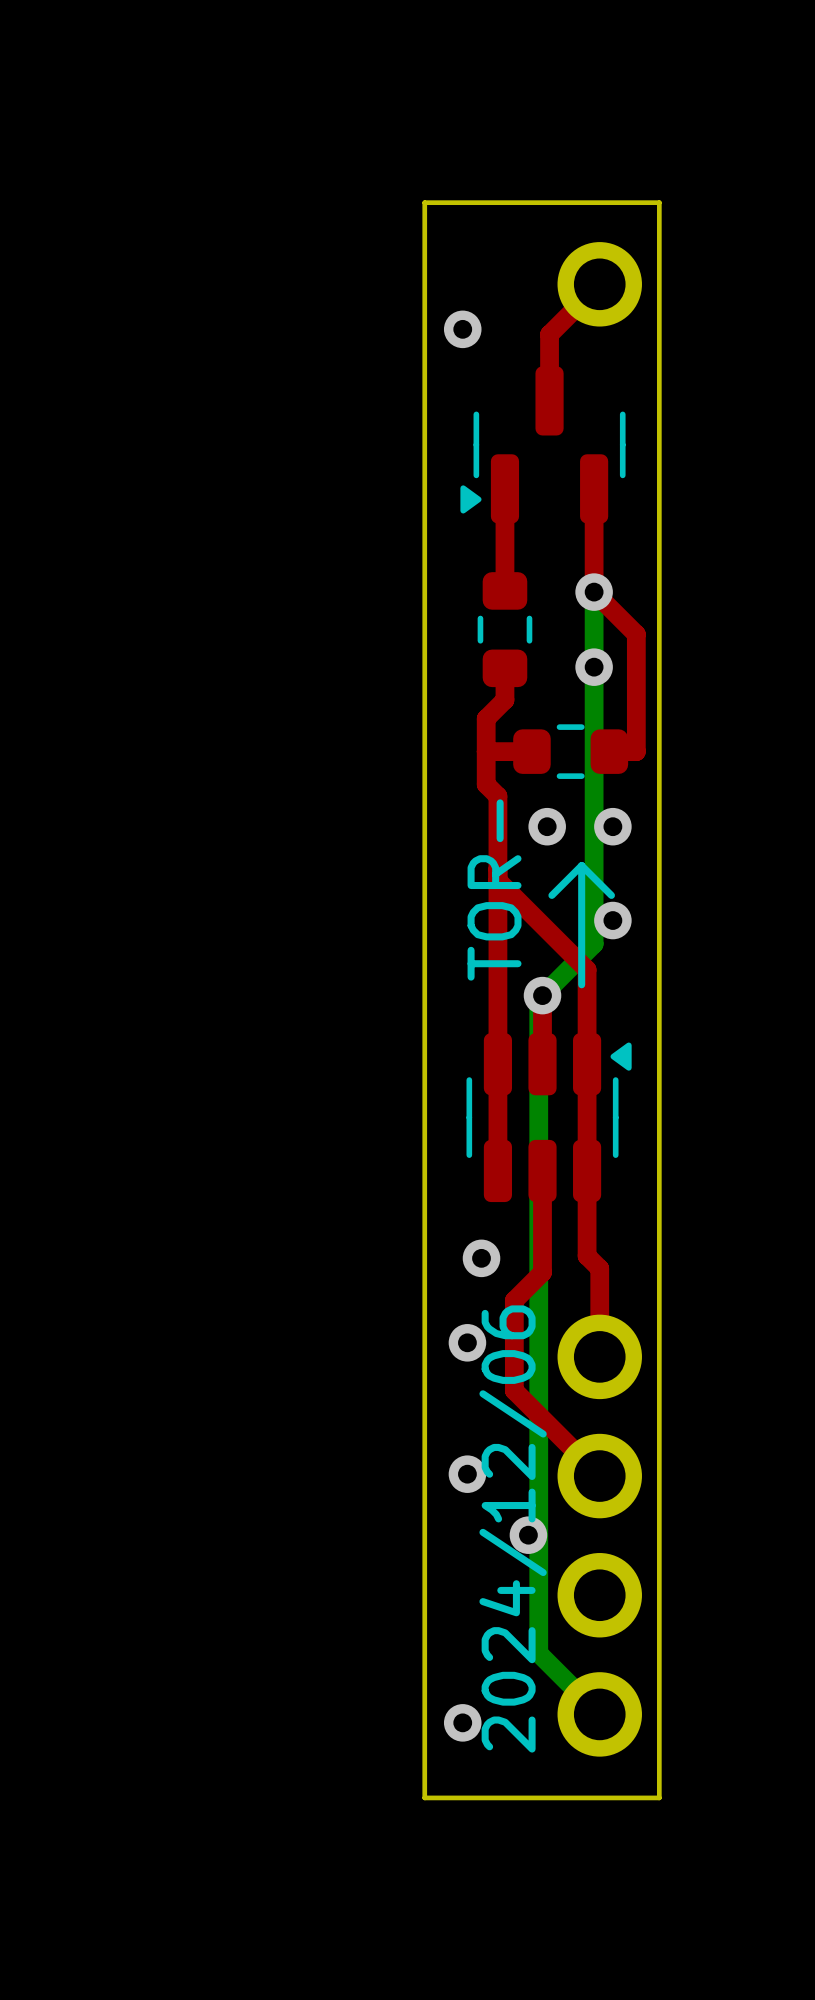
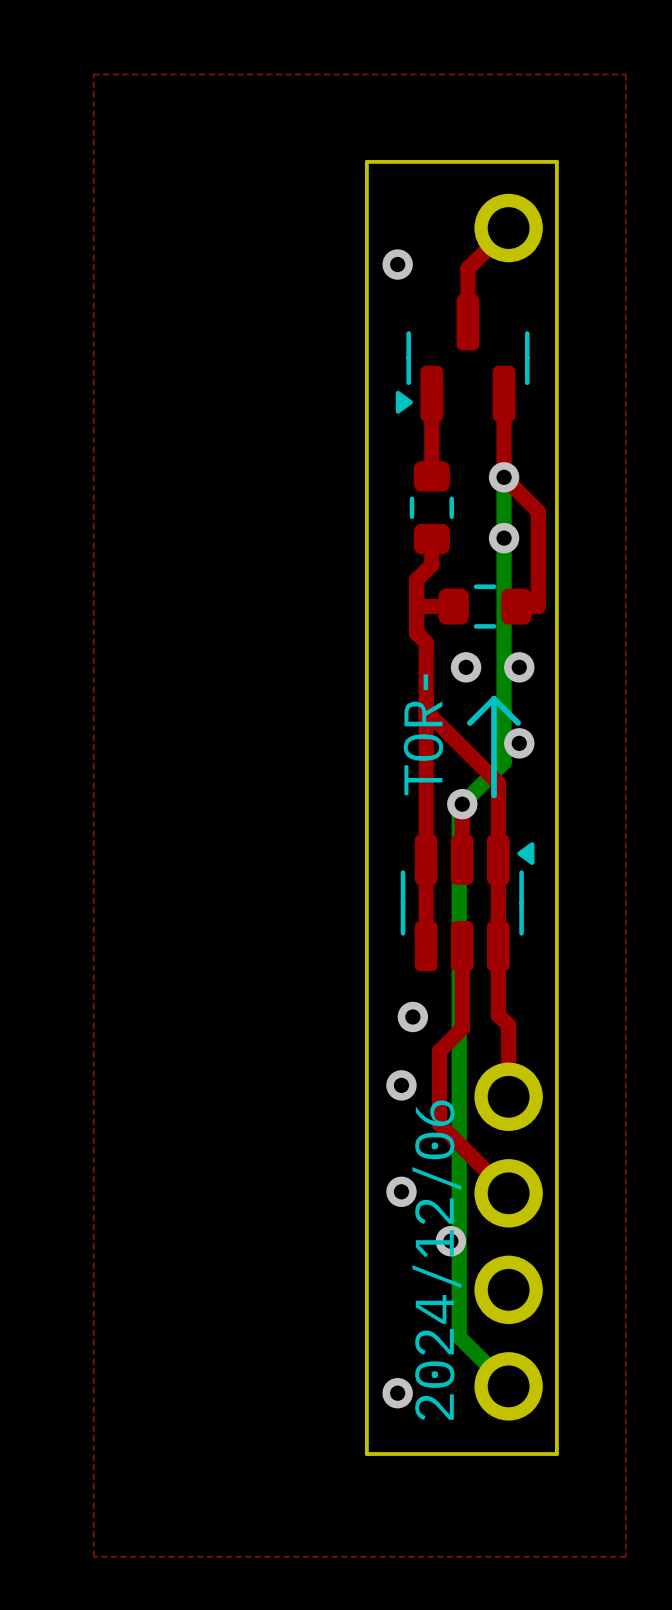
top zone outline: none -> (93, 74) (93, 1556) (625, 1556) (625, 74) (93, 74)

